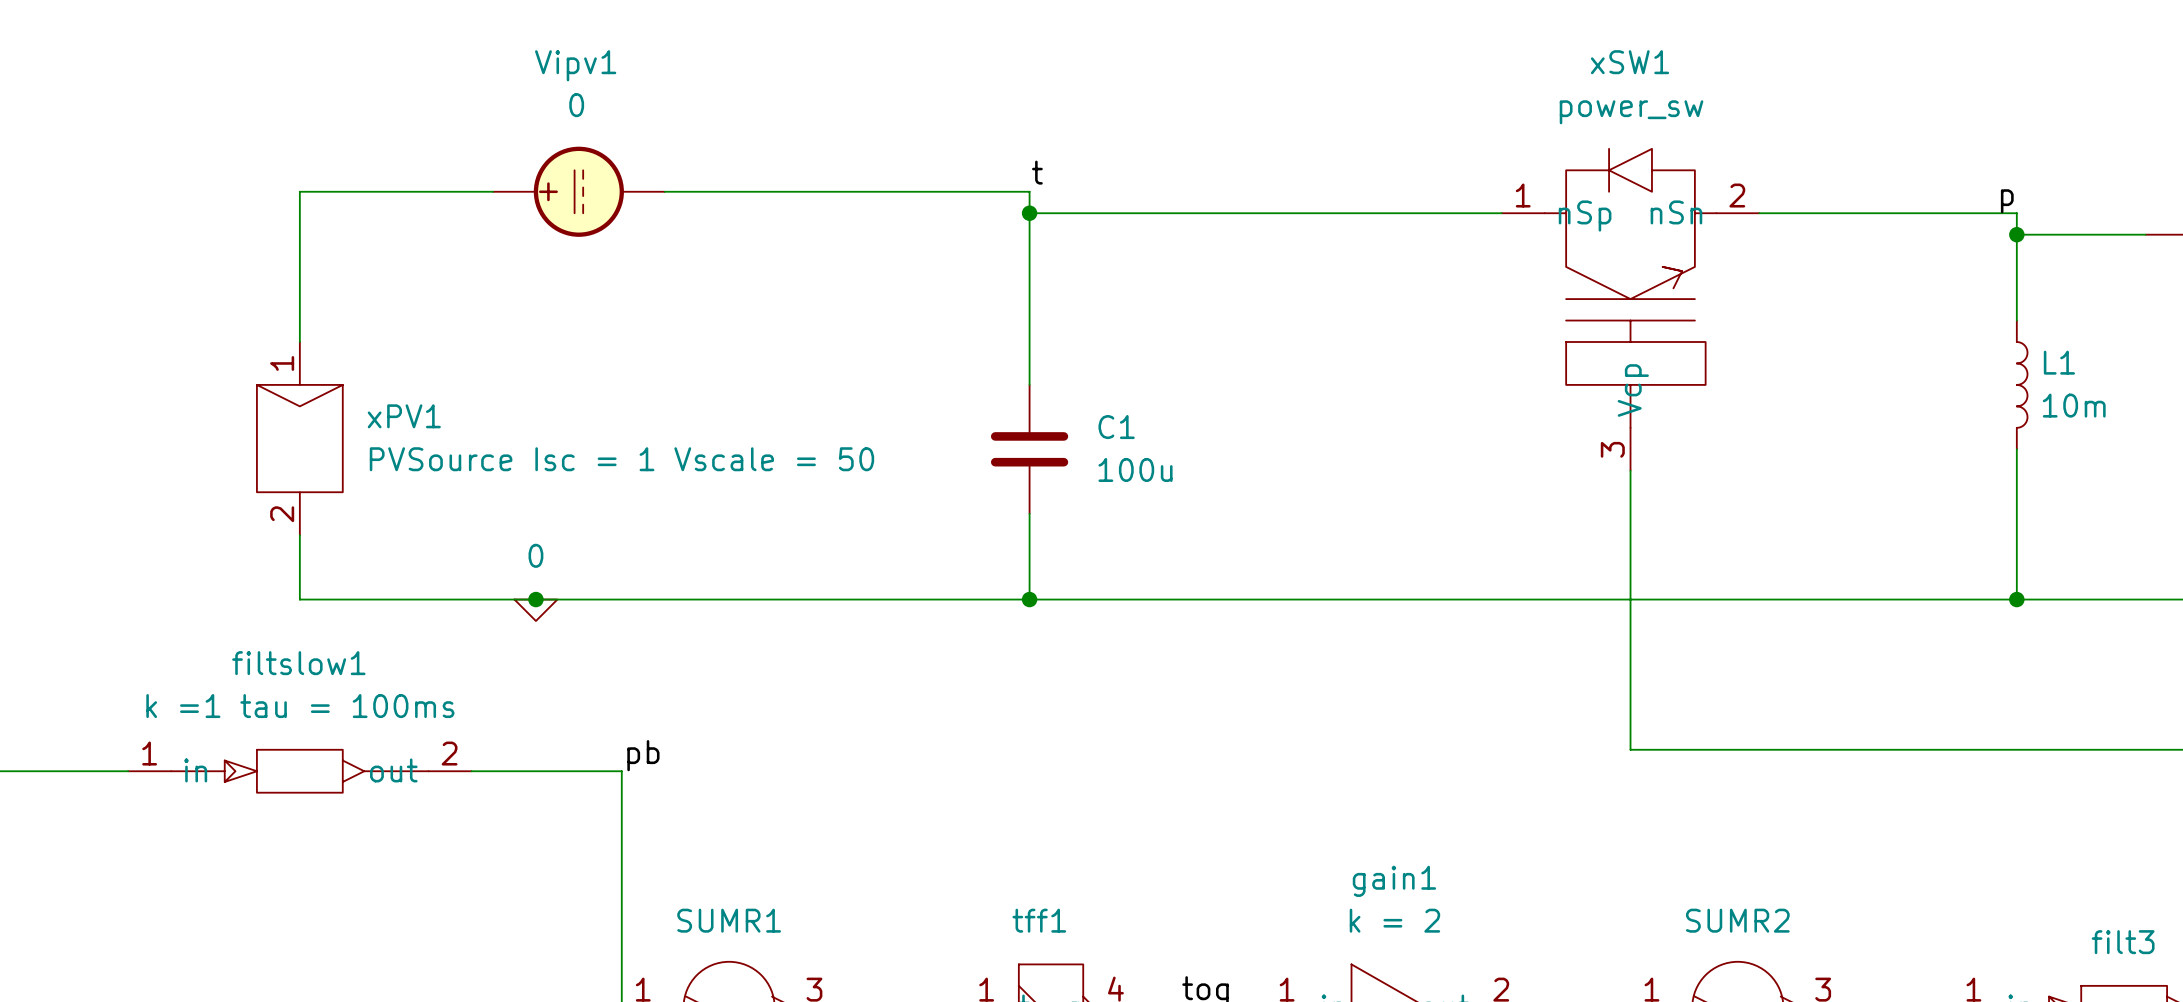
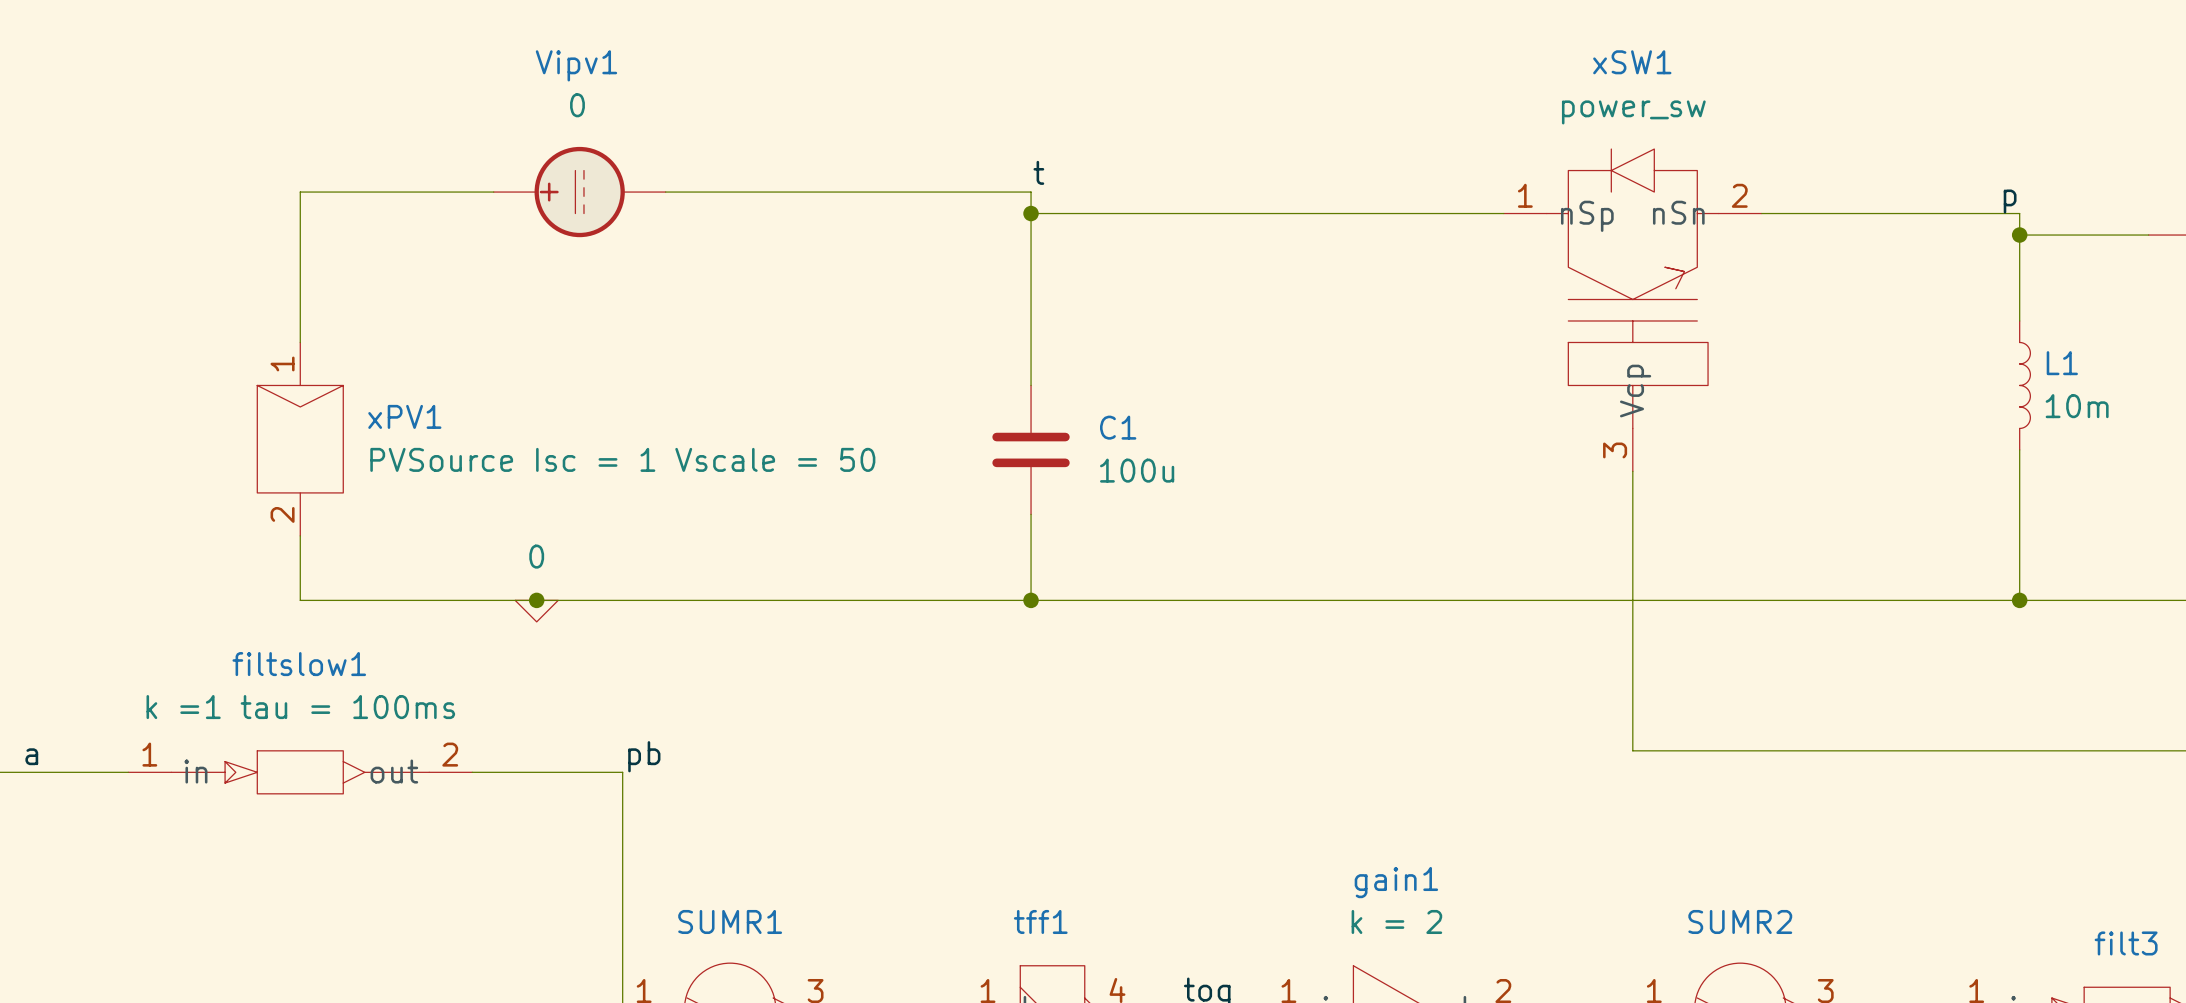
label: none -> a (31, 756)

